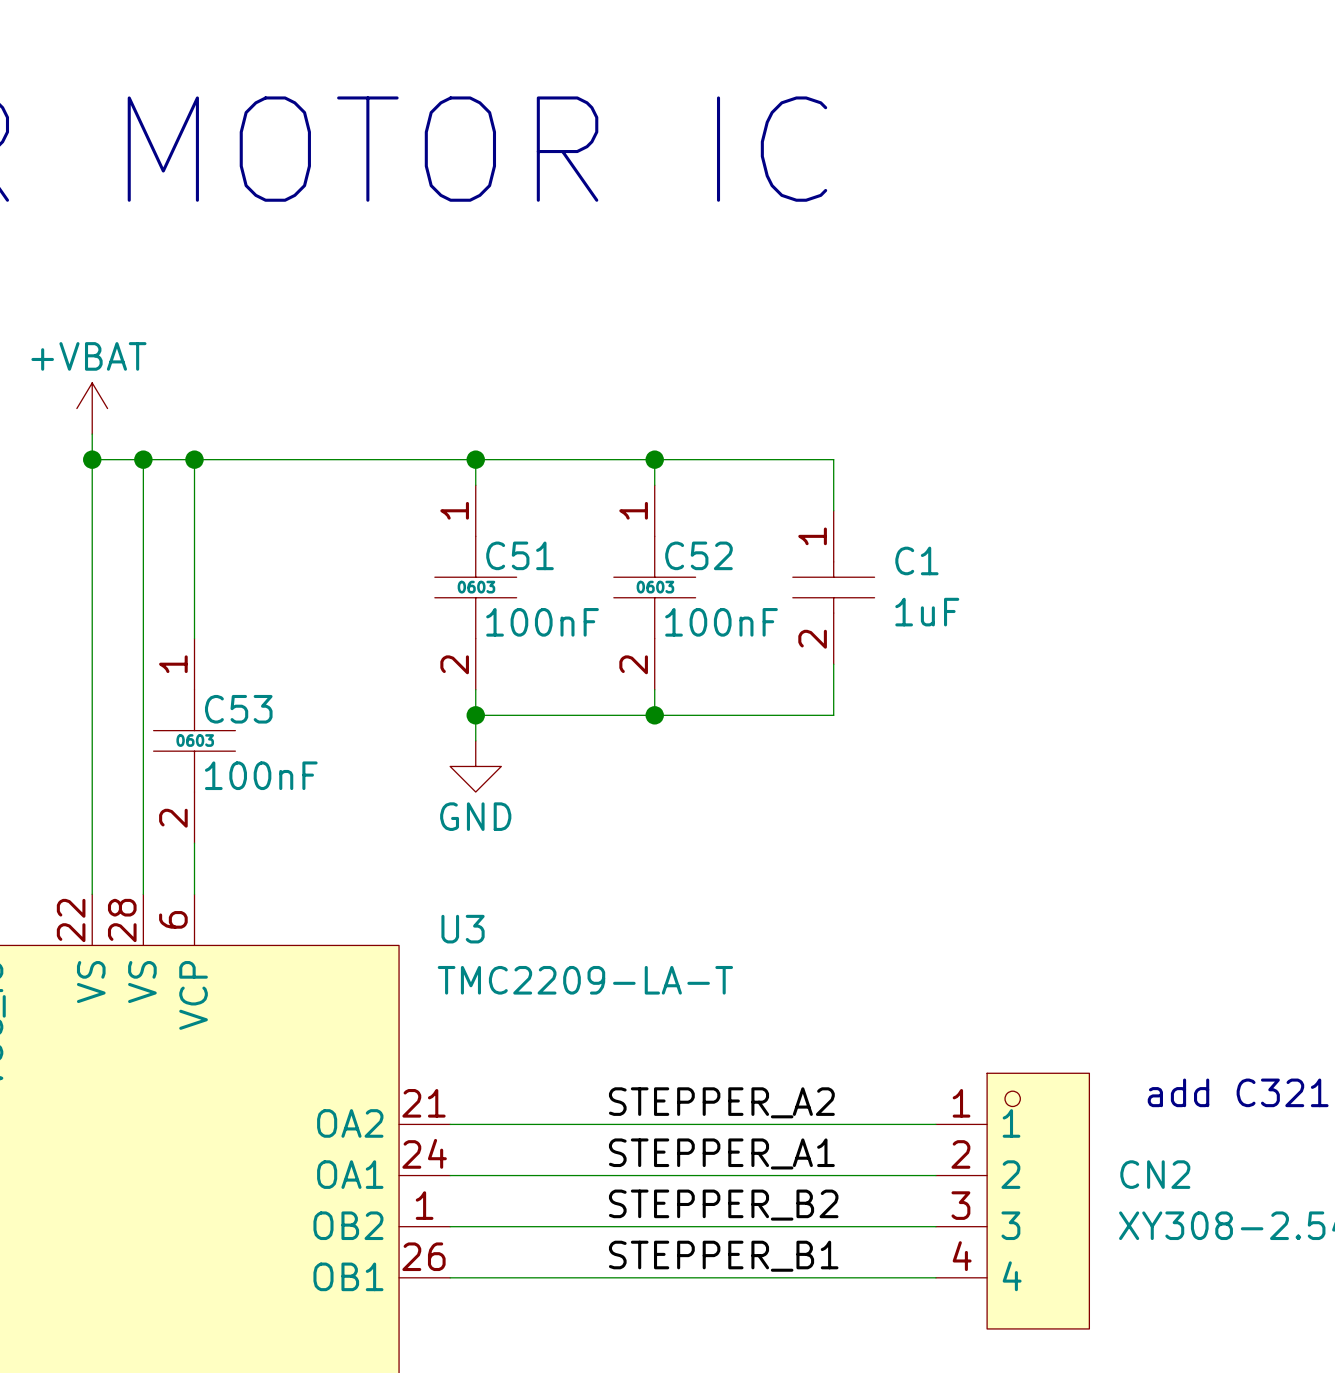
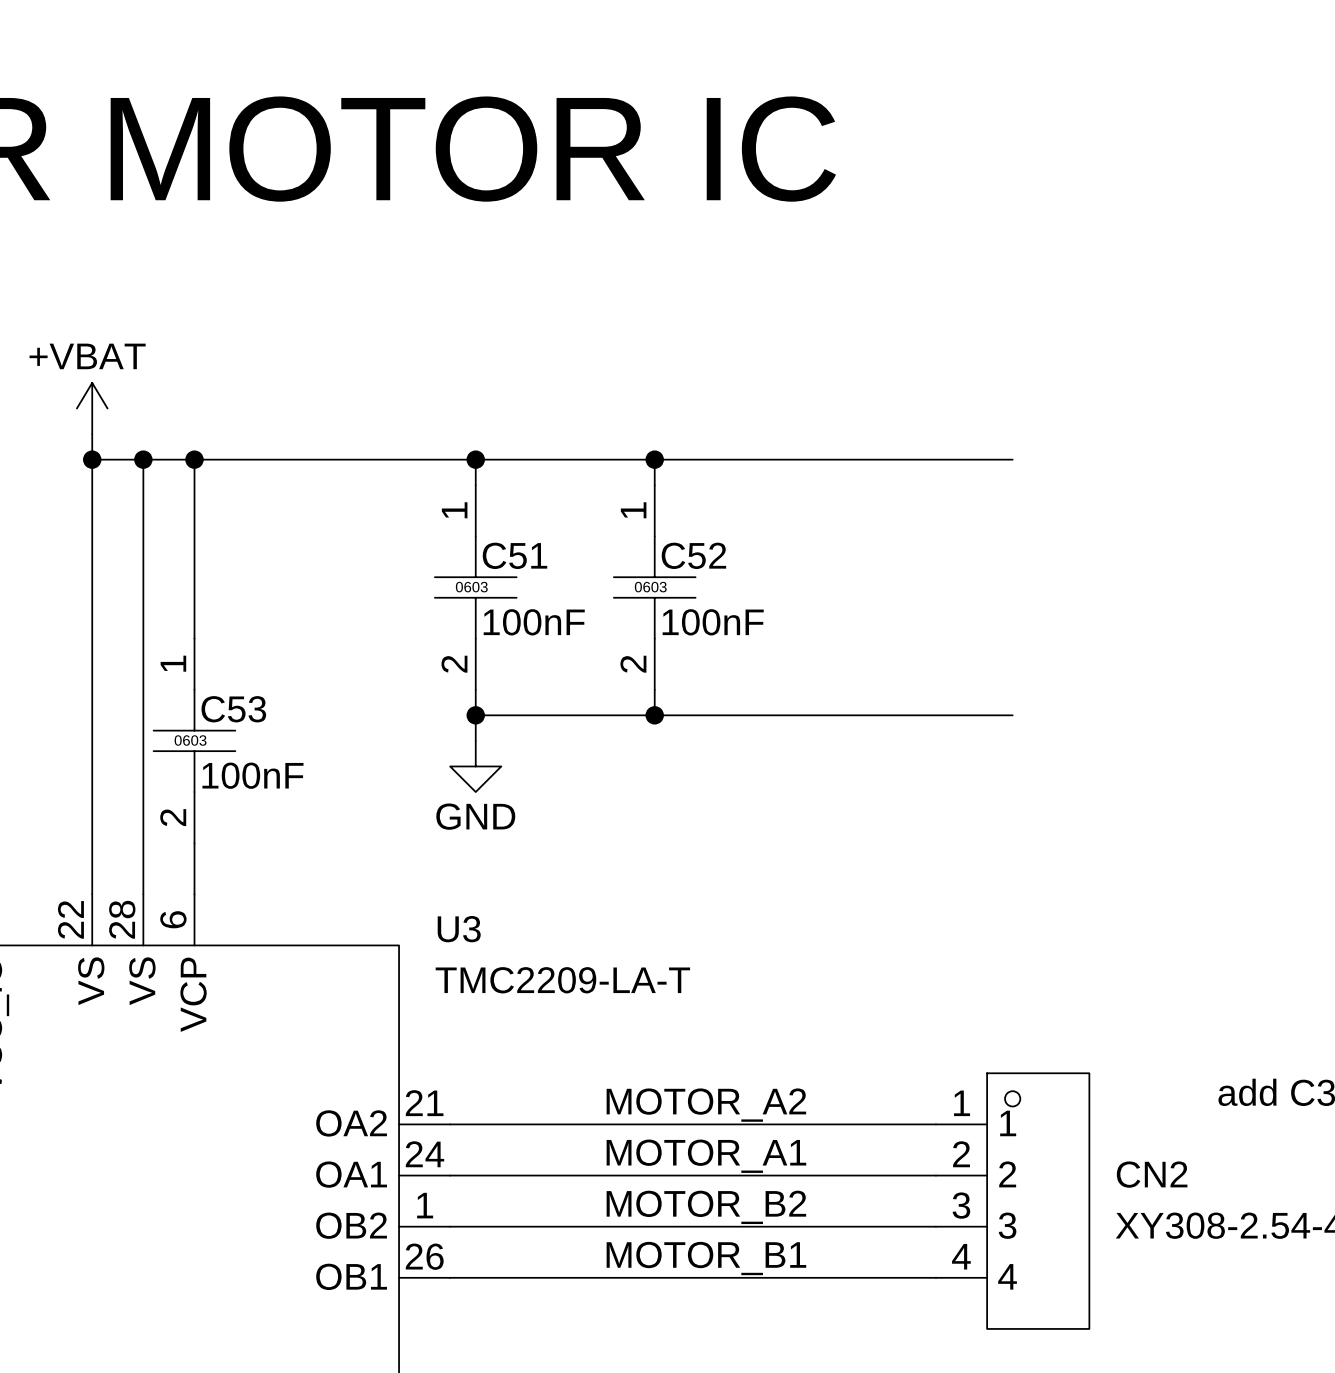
wire: (833, 459) (833, 510) -> (833, 459) (1012, 459)
C1: (833, 587) -> none
wire: (833, 664) (833, 715) -> (1012, 715) (833, 715)
label: STEPPER_A2 (721, 1102) -> MOTOR_A2 (706, 1105)
label: STEPPER_A1 (721, 1153) -> MOTOR_A1 (706, 1156)
label: STEPPER_B2 (723, 1205) -> MOTOR_B2 (706, 1207)
label: STEPPER_B1 (723, 1256) -> MOTOR_B1 (706, 1258)

